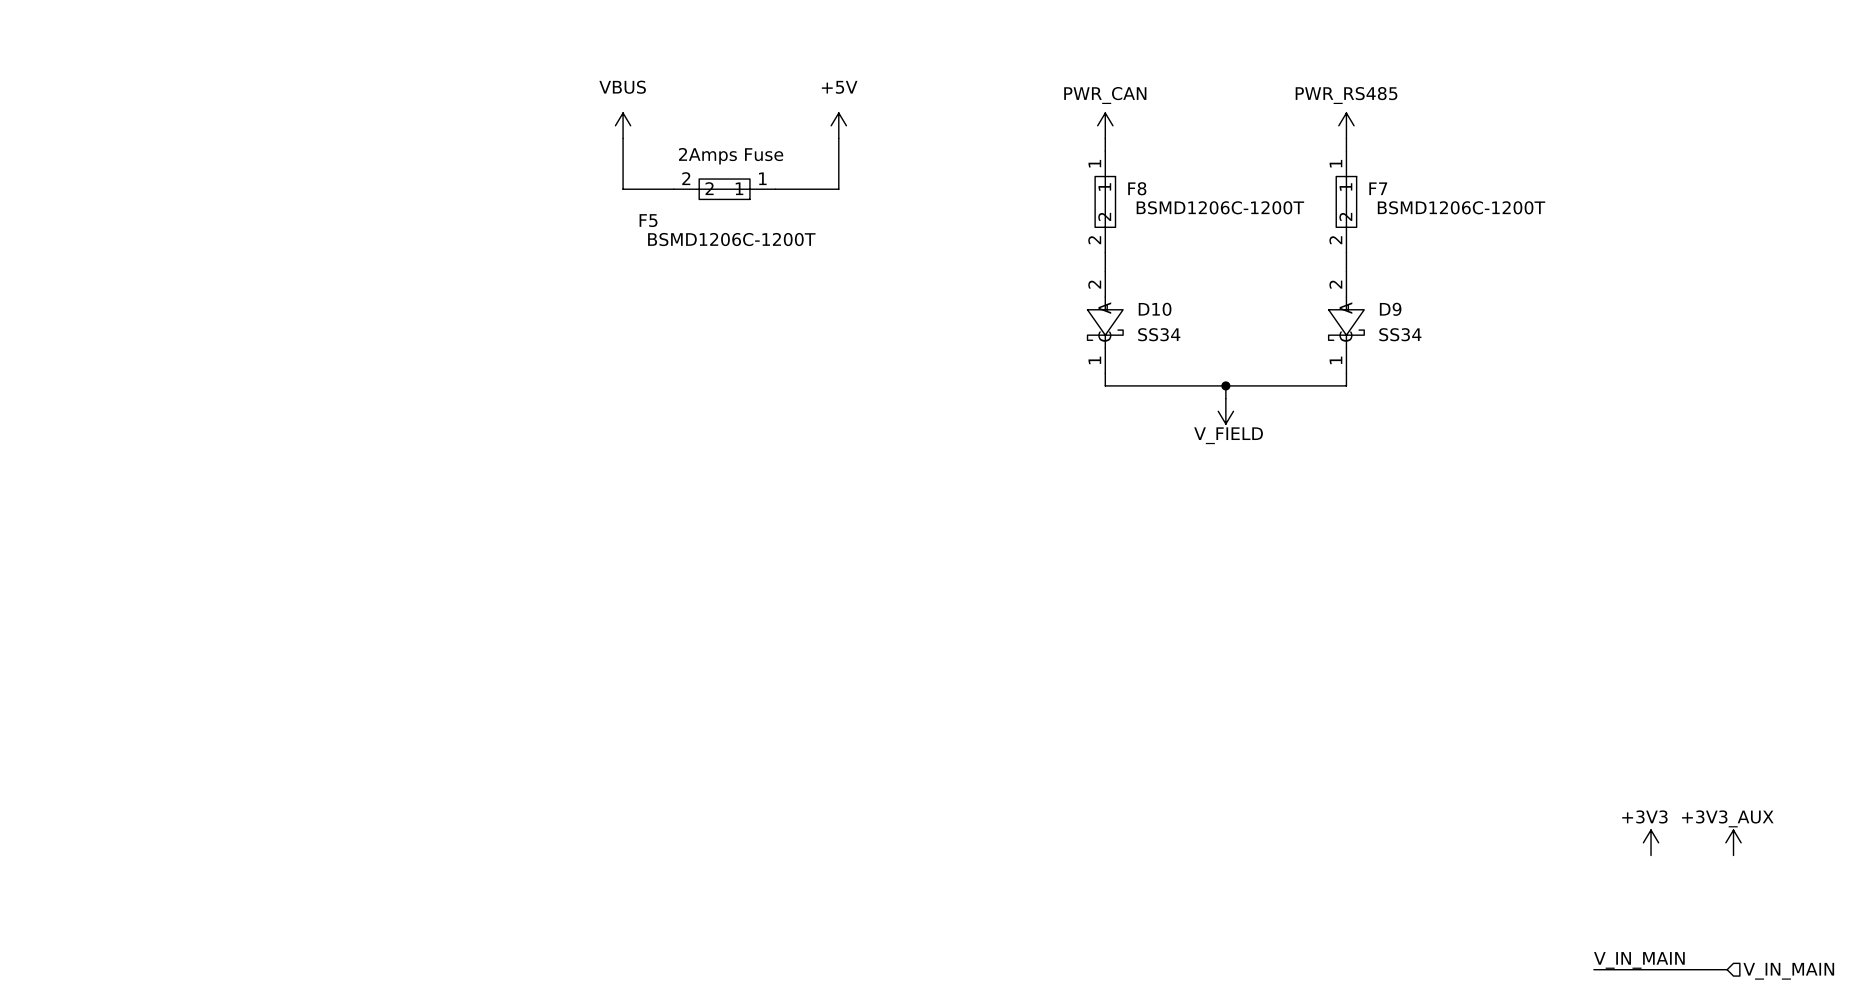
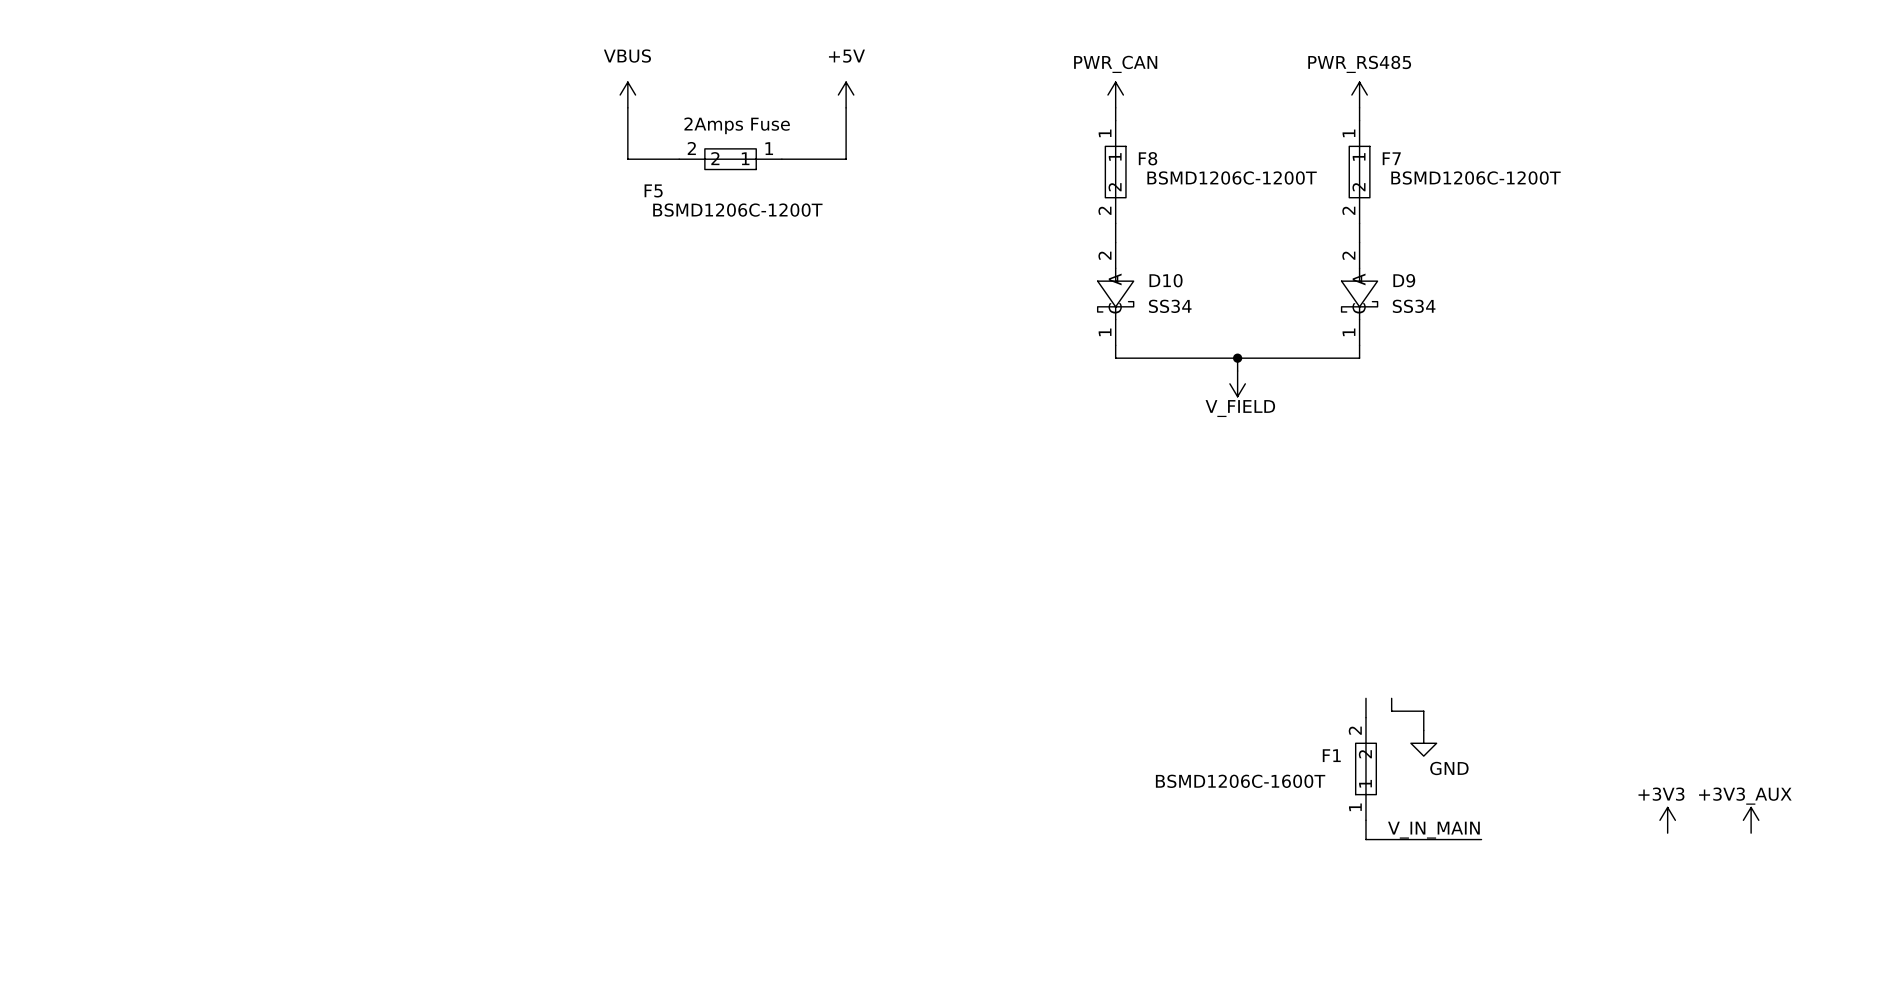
wire: none -> (1365, 698) (1365, 717)
wire: none -> (1391, 698) (1391, 711) (1423, 711) (1423, 730)
power symbol: none -> GND (1423, 743)
F1: none -> BSMD1206C-1600T (1365, 768)
wire: none -> (1365, 820) (1365, 839) (1481, 839)
label position: V_IN_MAIN (1639, 960) -> V_IN_MAIN (1433, 830)
wire: (1593, 969) (1727, 969) -> none
hierarchical label: V_IN_MAIN (1788, 971) -> none

